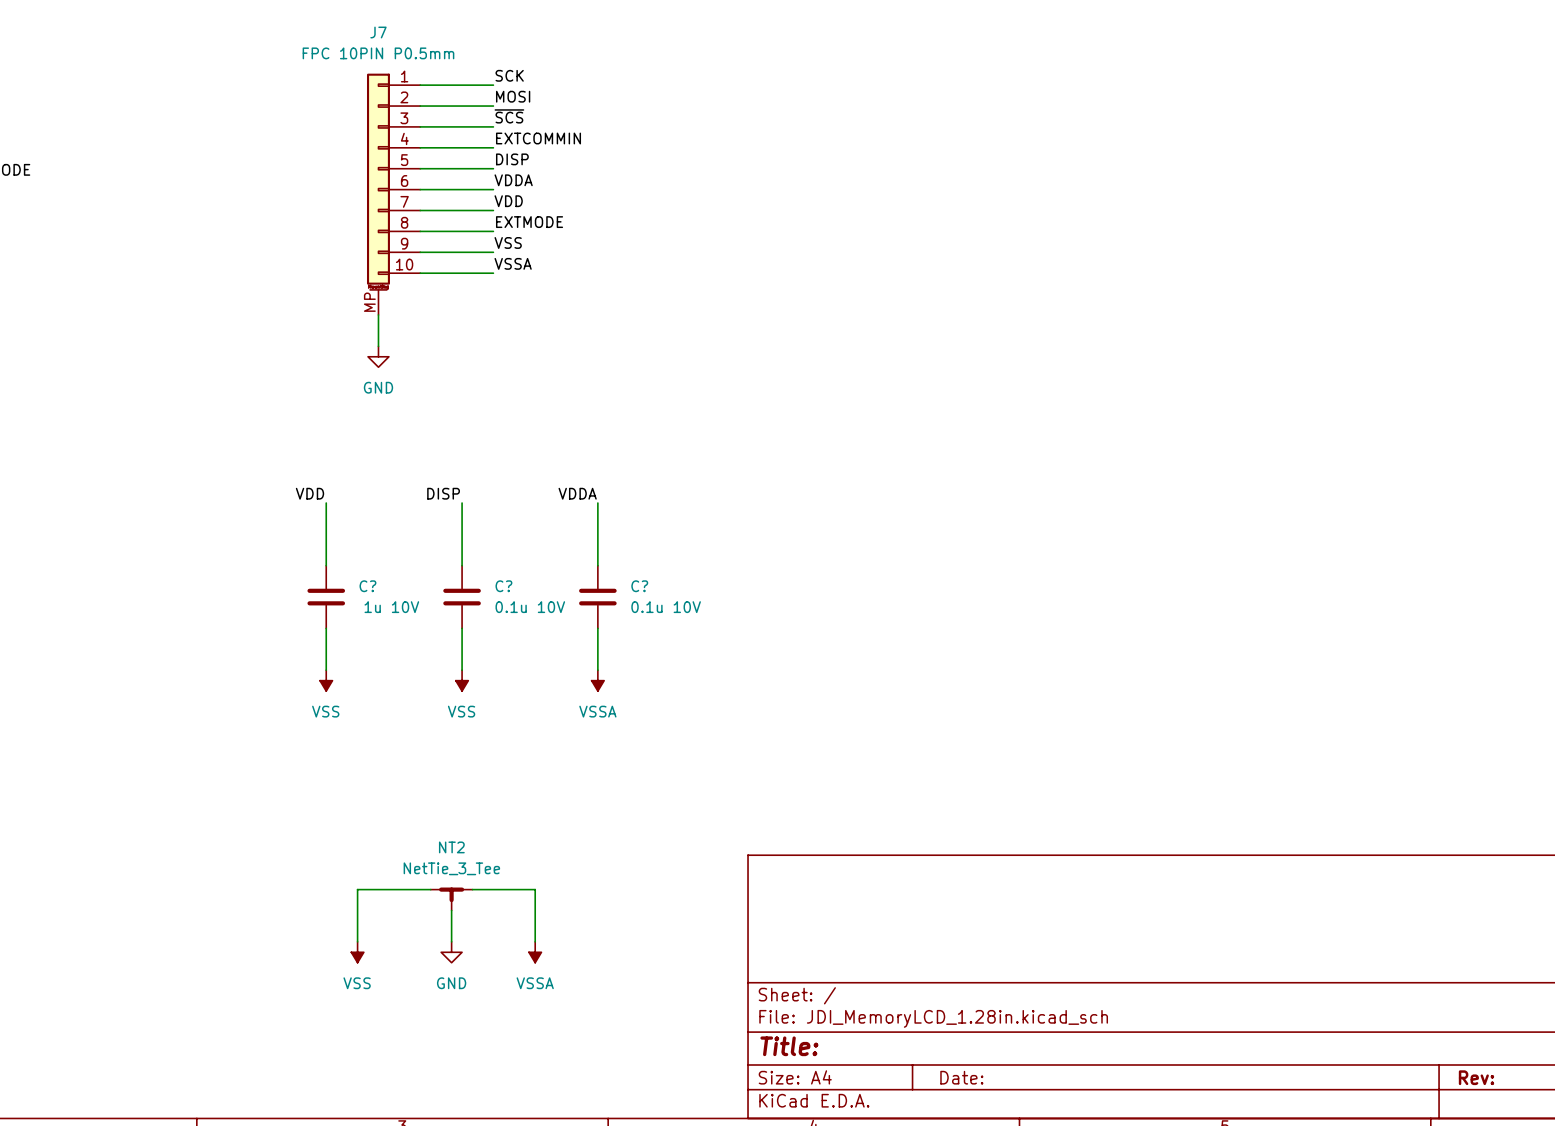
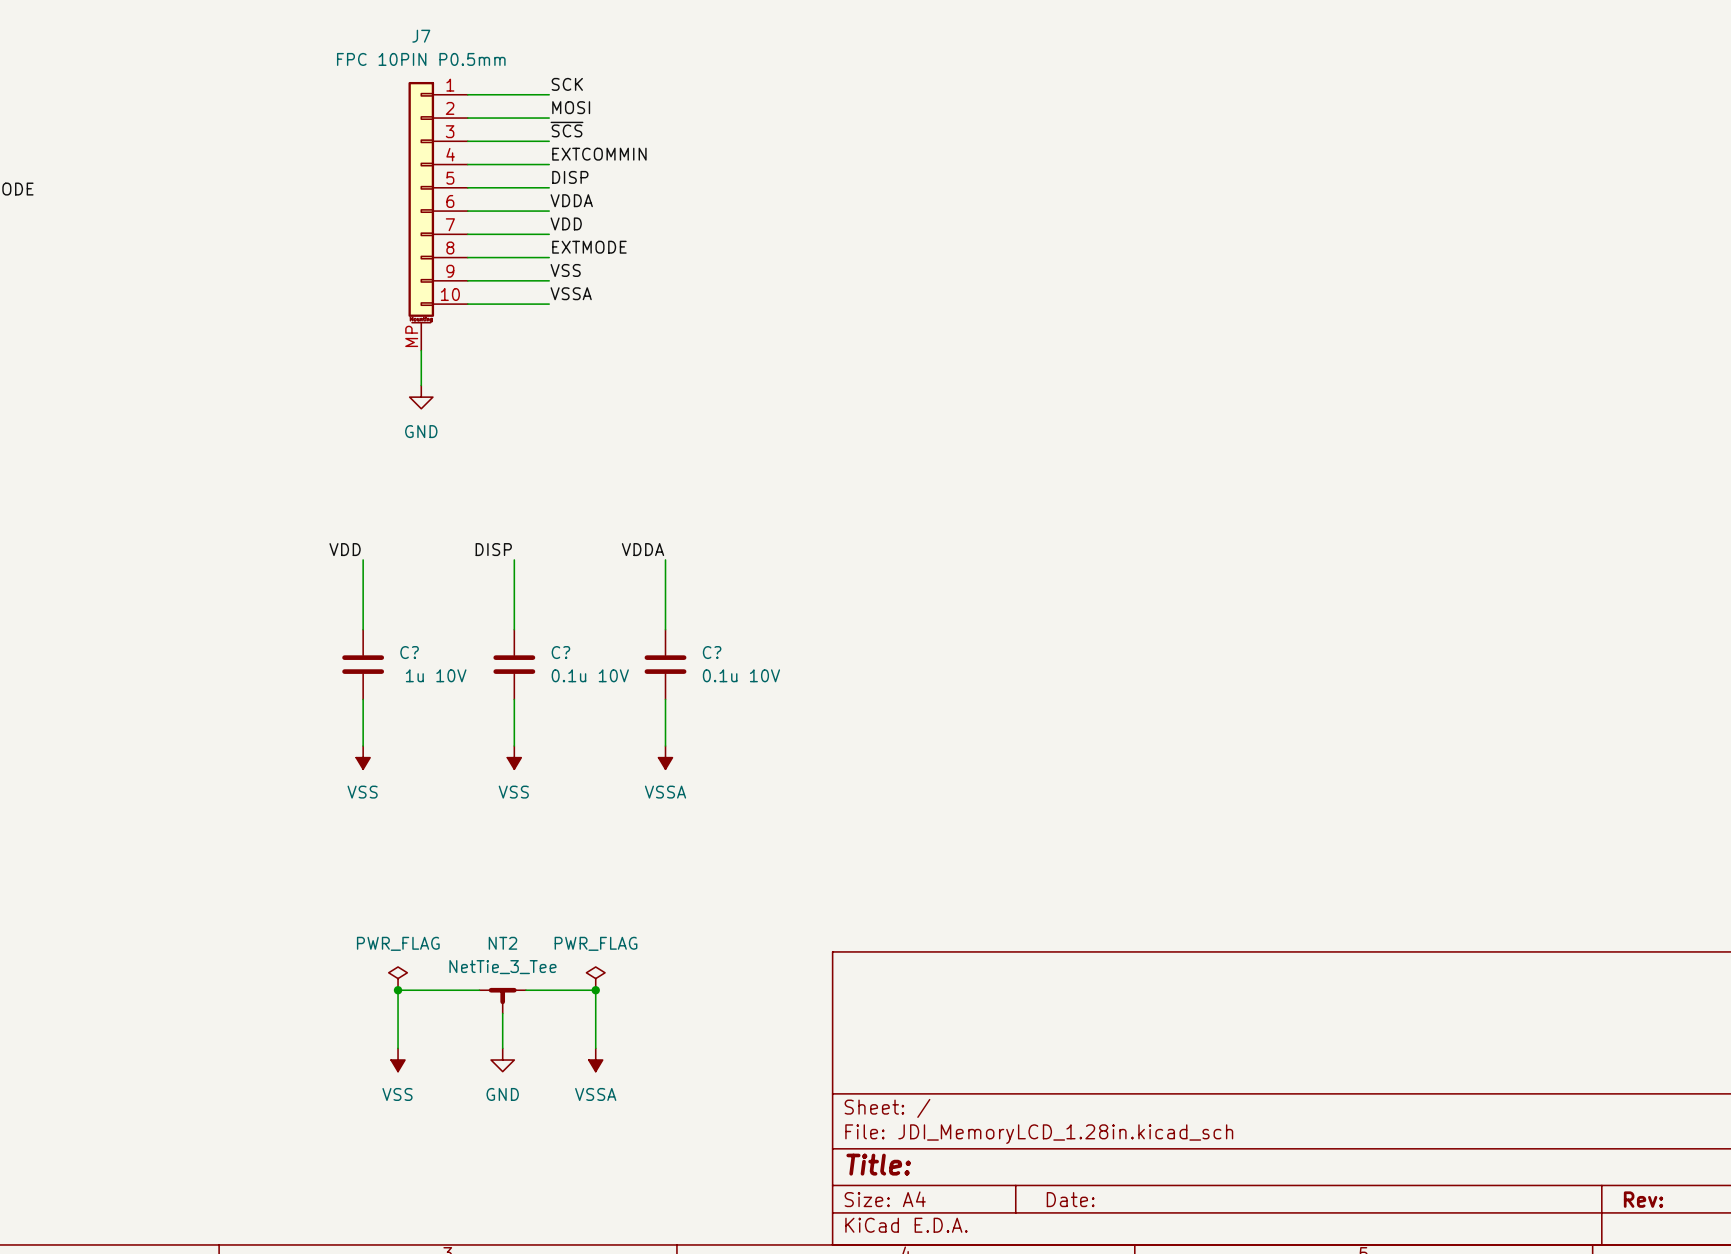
power symbol: none -> PWR_FLAG (398, 978)
power symbol: none -> PWR_FLAG (595, 978)
junction: none -> (398, 990)
junction: none -> (595, 990)

